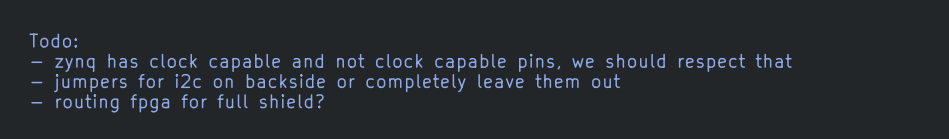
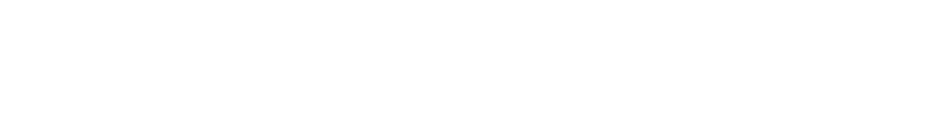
text: Todo: (53, 40) -> none
text: - zynq has clock capable and not clock capable pins, we should respect that (411, 62) -> none
text: - jumpers for i2c on backside or completely leave them out (325, 83) -> none
text: - routing fpga for full shield? (177, 103) -> none

